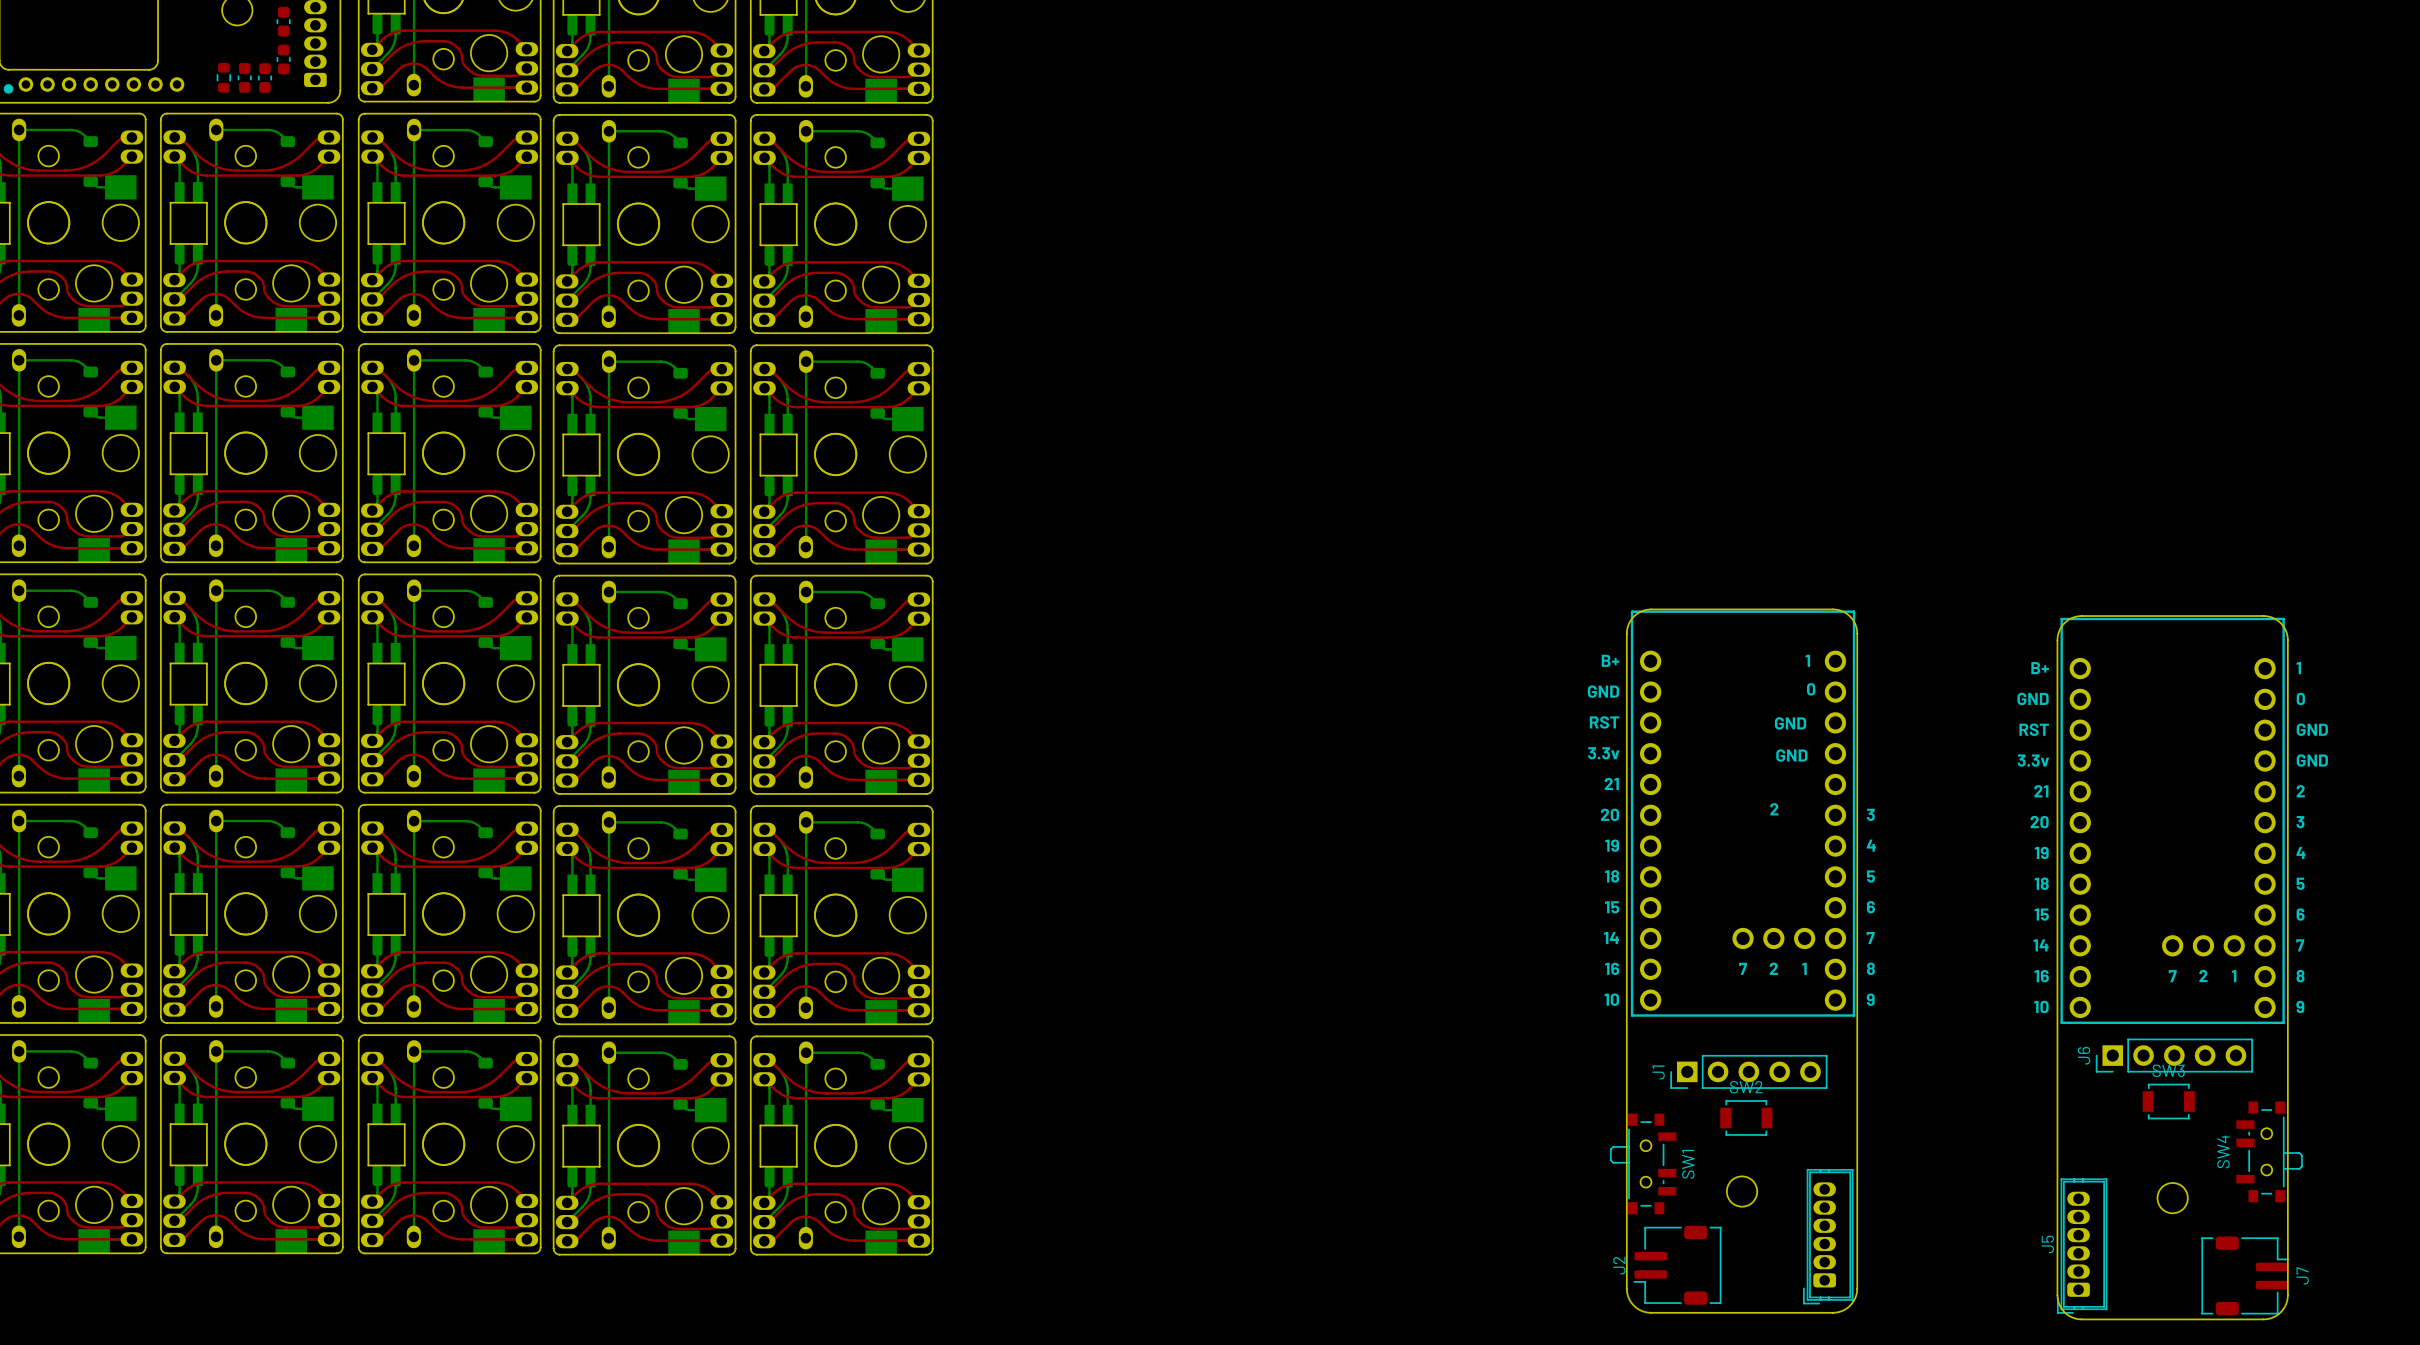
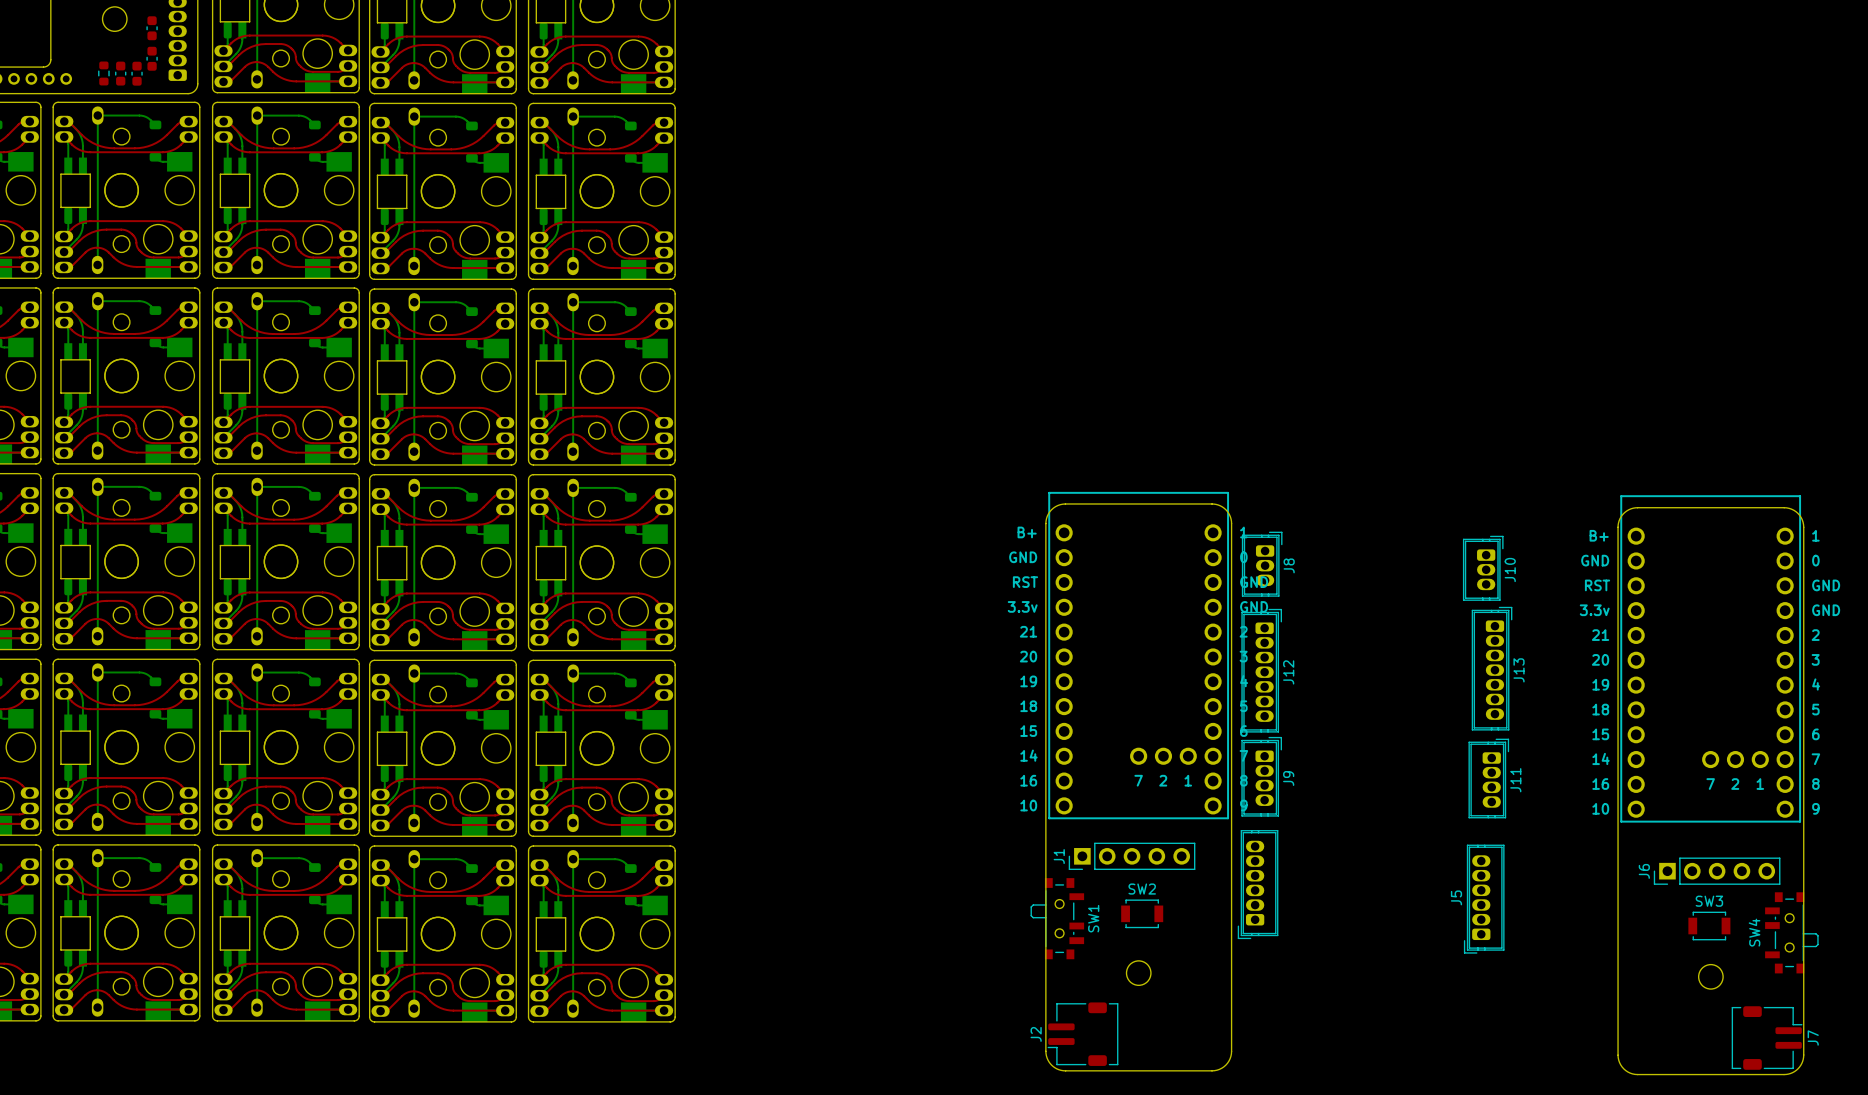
board edge: (1651, 609) (1835, 609) (1848, 614) (1856, 628) (1857, 1288) (1852, 1303) (1839, 1311) (1648, 1312) (1633, 1305) (1627, 1293) (1626, 633) (1628, 624) (1633, 616) (1641, 611) (1651, 609) -> (1065, 503) (1214, 504) (1225, 509) (1231, 519) (1231, 1051) (1227, 1063) (1217, 1070) (1063, 1070) (1051, 1065) (1046, 1055) (1045, 523) (1051, 509) (1065, 503)
board edge: (2081, 616) (2266, 616) (2278, 621) (2287, 634) (2287, 1295) (2282, 1310) (2268, 1318) (2078, 1319) (2067, 1314) (2058, 1301) (2057, 640) (2058, 632) (2064, 623) (2071, 618) (2081, 616) -> (1637, 507) (1786, 507) (1798, 513) (1803, 522) (1803, 1055) (1799, 1067) (1788, 1074) (1635, 1074) (1623, 1068) (1618, 1060) (1618, 527) (1623, 513) (1637, 507)
J8: none -> (1262, 564)
J10: none -> (1483, 568)
part: none -> (1138, 655)
part: (1743, 813) -> none
J13: none -> (1492, 668)
J12: none -> (1261, 670)
part position: (2172, 820) -> (1710, 658)
J9: none -> (1261, 776)
J11: none -> (1488, 778)
J6 position: (2174, 1055) -> (1717, 871)
J1 position: (1748, 1071) -> (1132, 856)
SW3 position: (2168, 1101) -> (1709, 926)
SW2 position: (1746, 1117) -> (1142, 913)
SW4 position: (2269, 1151) -> (1791, 932)
SW1 position: (1643, 1163) -> (1057, 918)
round board edge position: (1742, 1191) -> (1138, 973)
round board edge position: (2172, 1198) -> (1710, 976)
part position: (1828, 1236) -> (1258, 884)
J5 position: (2082, 1246) -> (1484, 899)
J2 position: (1677, 1265) -> (1082, 1034)
J7 position: (2245, 1275) -> (1767, 1038)

